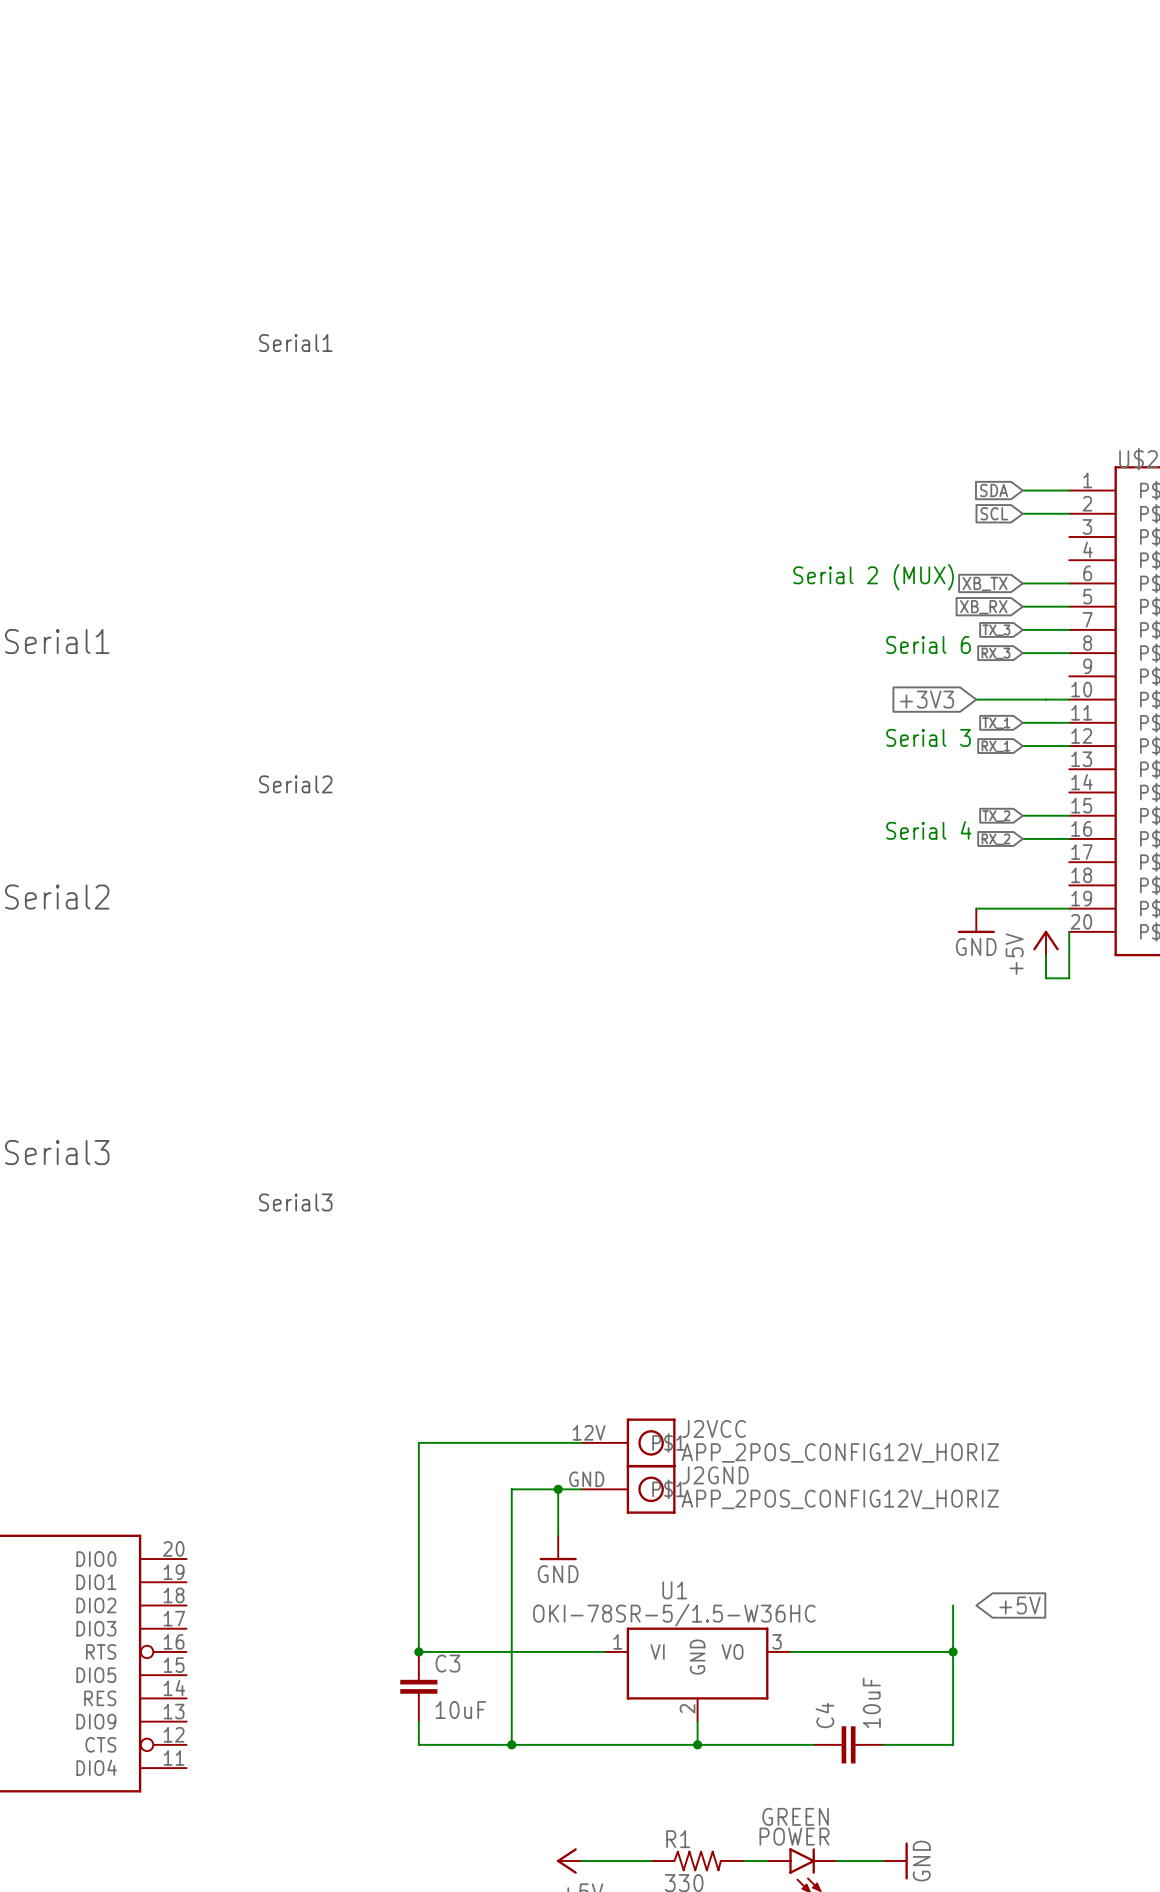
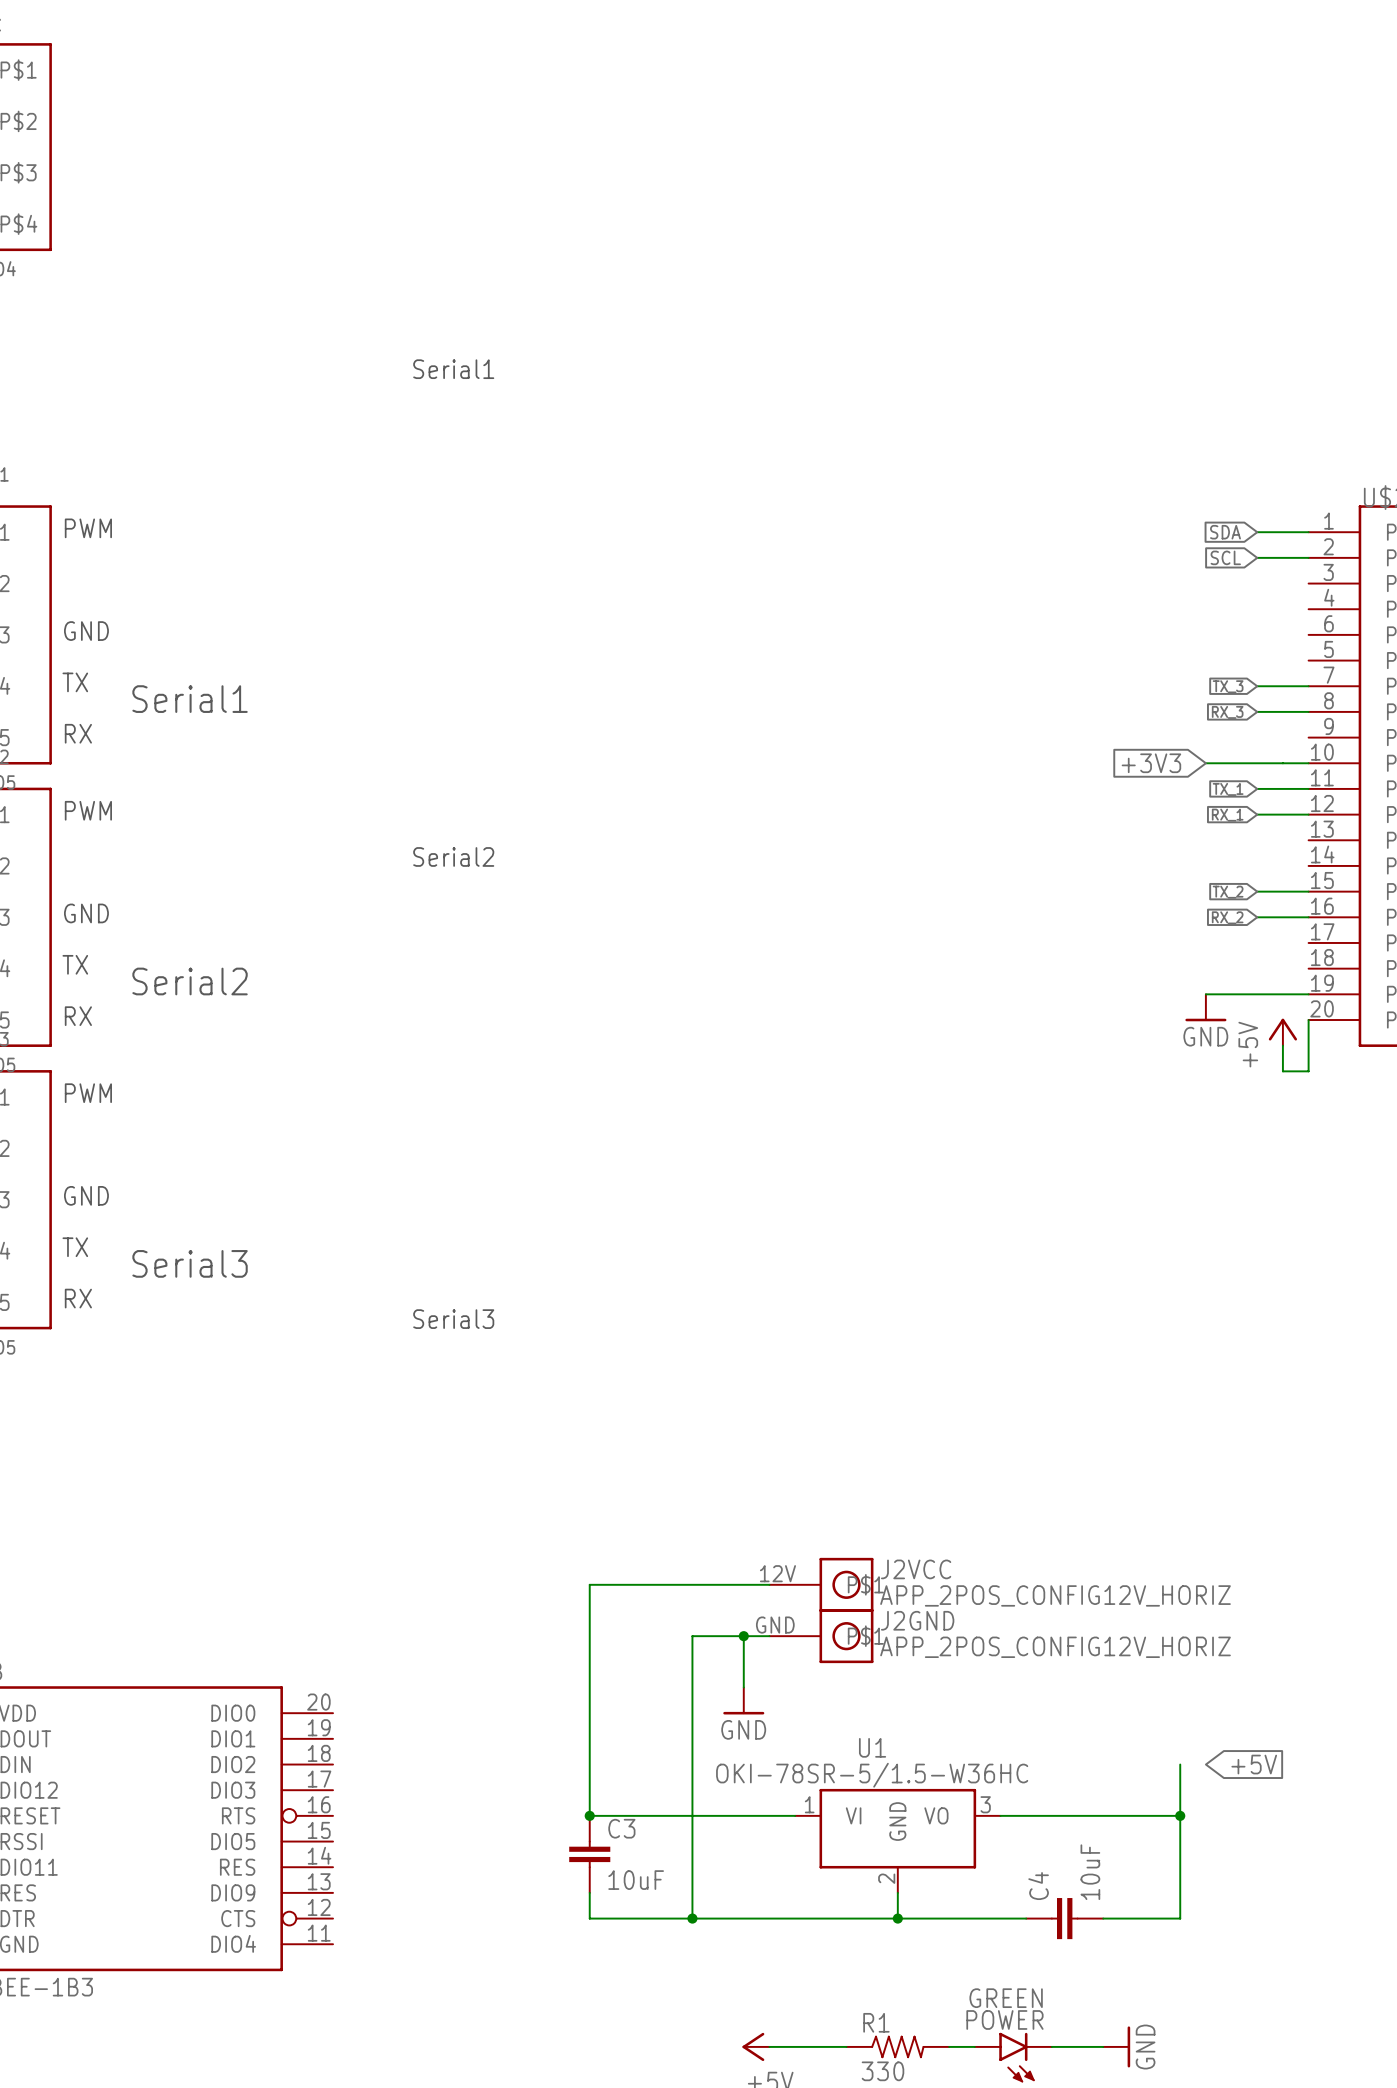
text: Serial 2 (MUX) (873, 577) -> none
wire: (1022, 583) (1069, 583) -> none
global label: XB_TX (985, 584) -> none
wire: (1022, 606) (1069, 606) -> none
global label: XB_RX (983, 607) -> none
text: Serial 6 (928, 645) -> none
text: Serial 3 (928, 737) -> none
text: Serial 4 (928, 830) -> none

